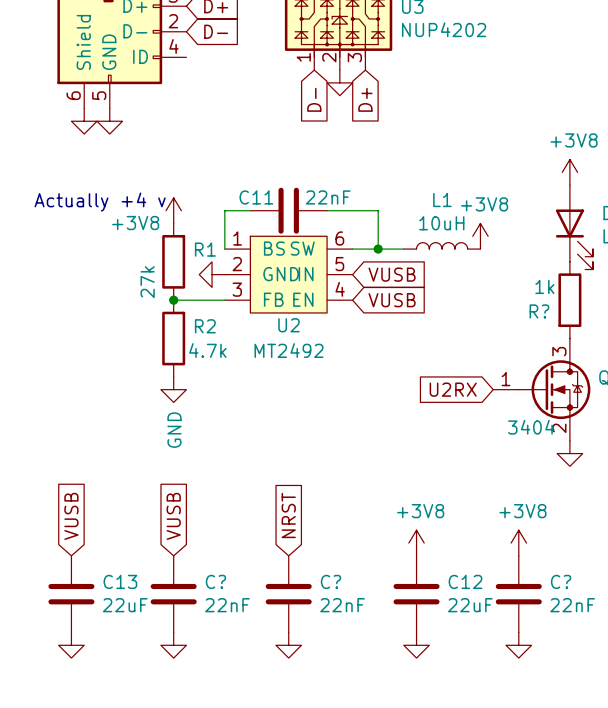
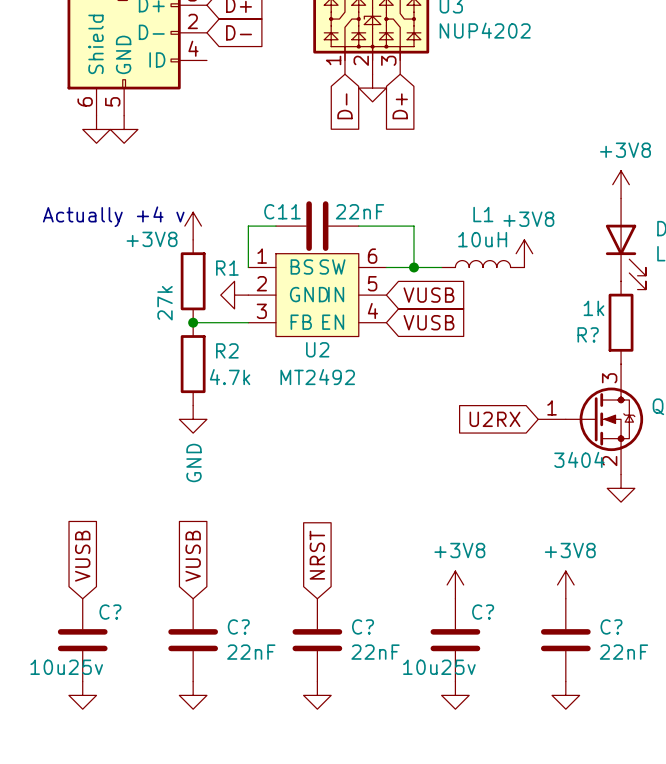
C13 name: C13 (120, 581) -> C? (110, 612)
C12 name: C12 (465, 581) -> C? (483, 612)
C13 value: 22uF (125, 605) -> 10u25v (66, 667)
C12 value: 22uF (470, 605) -> 10u25v (439, 667)

